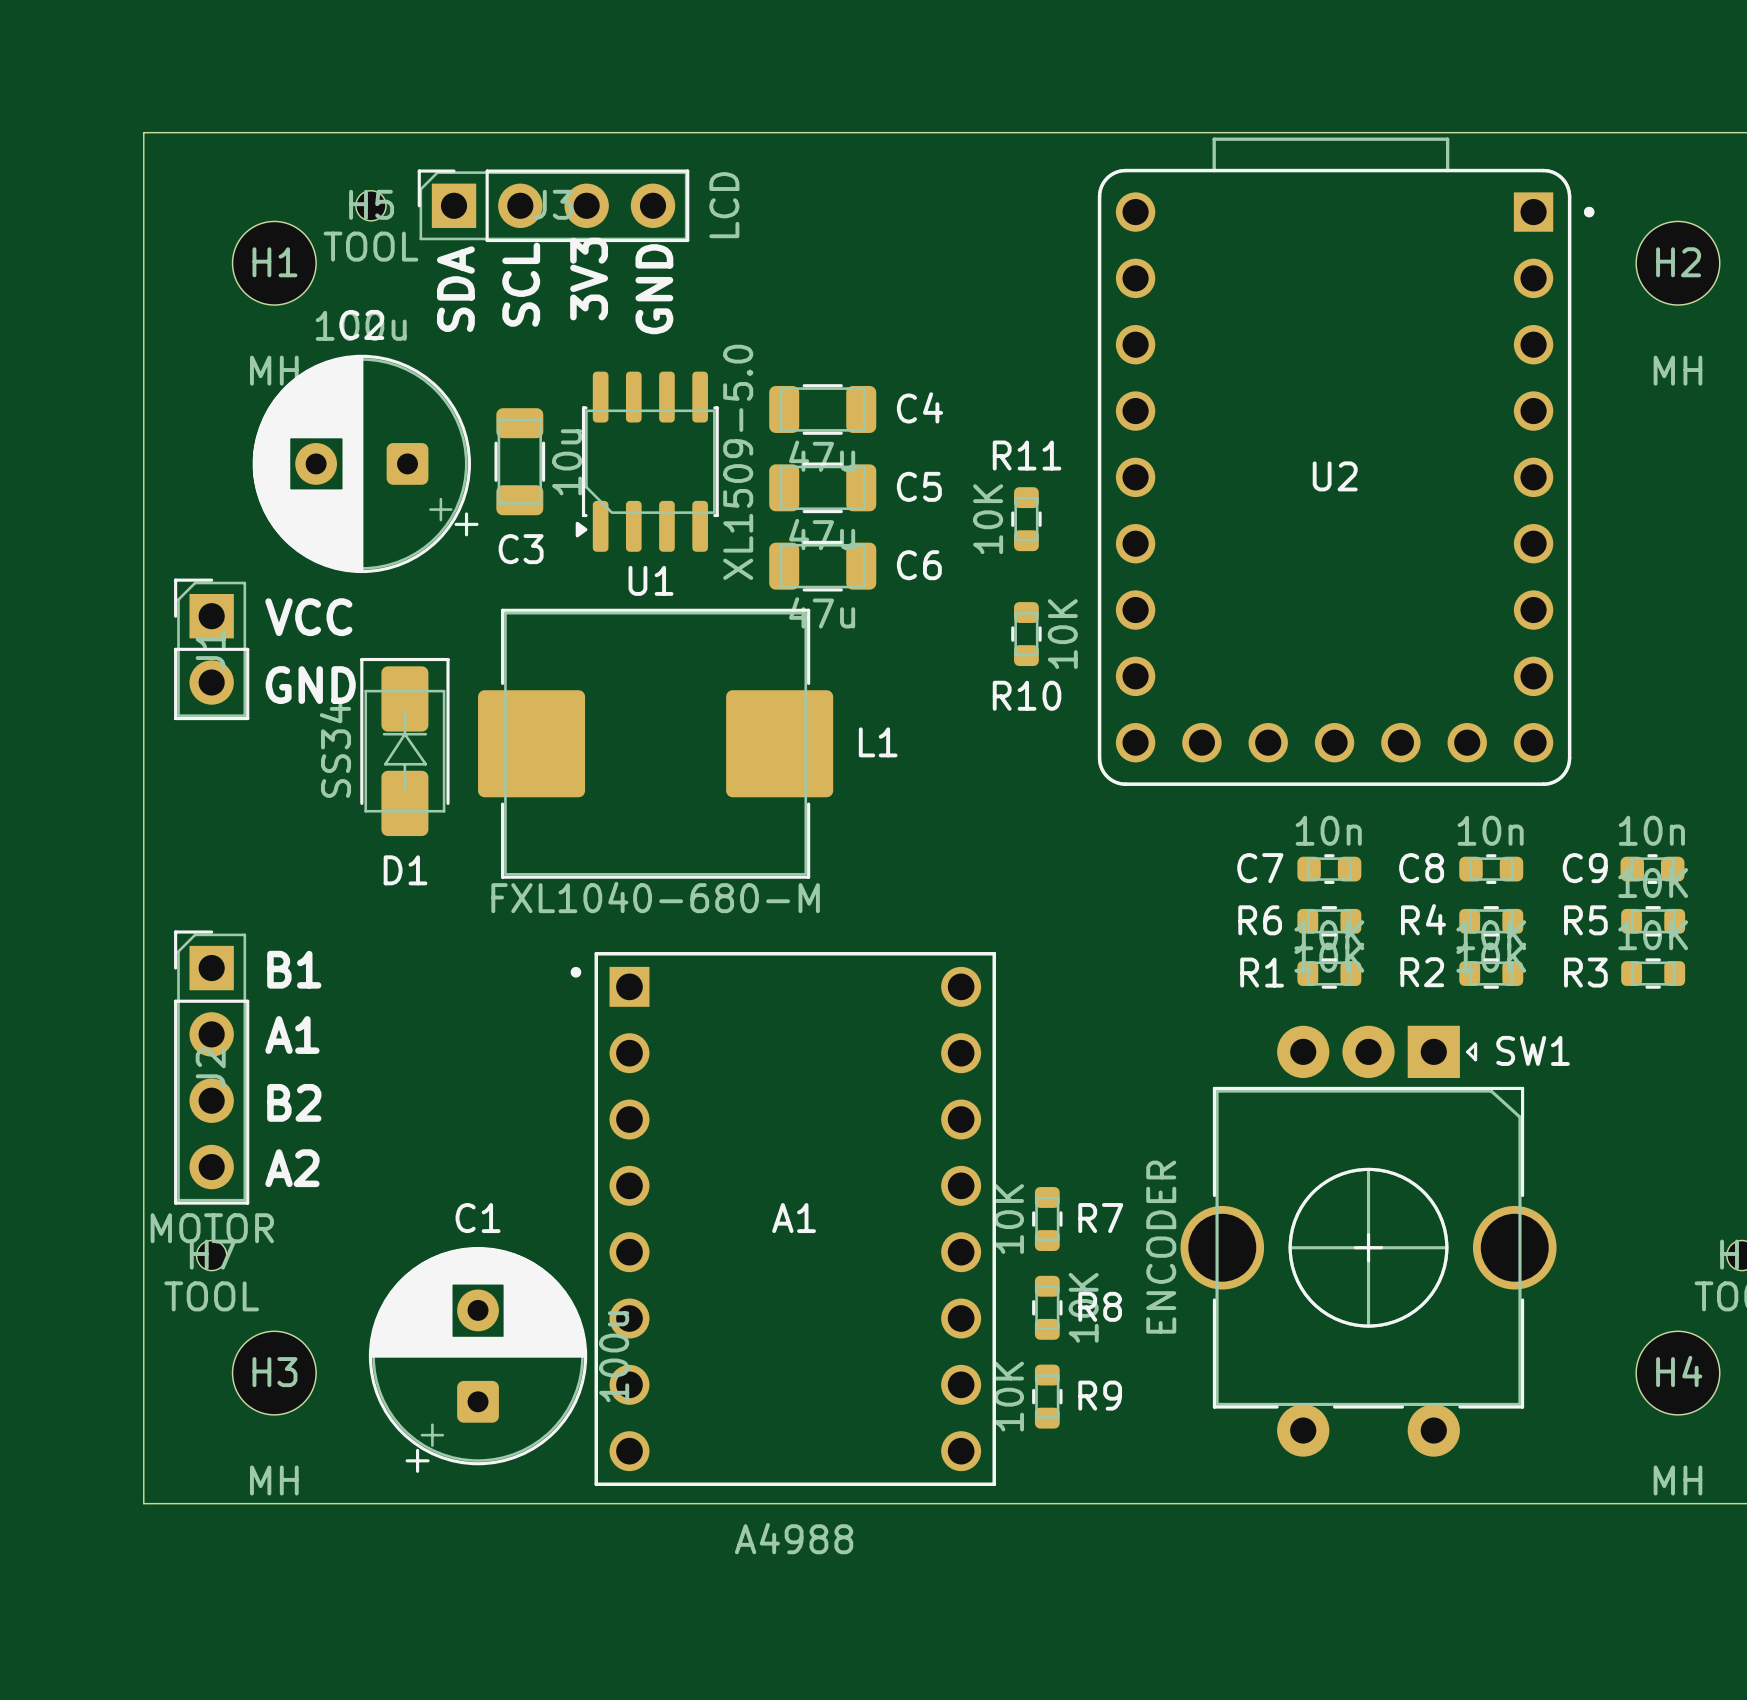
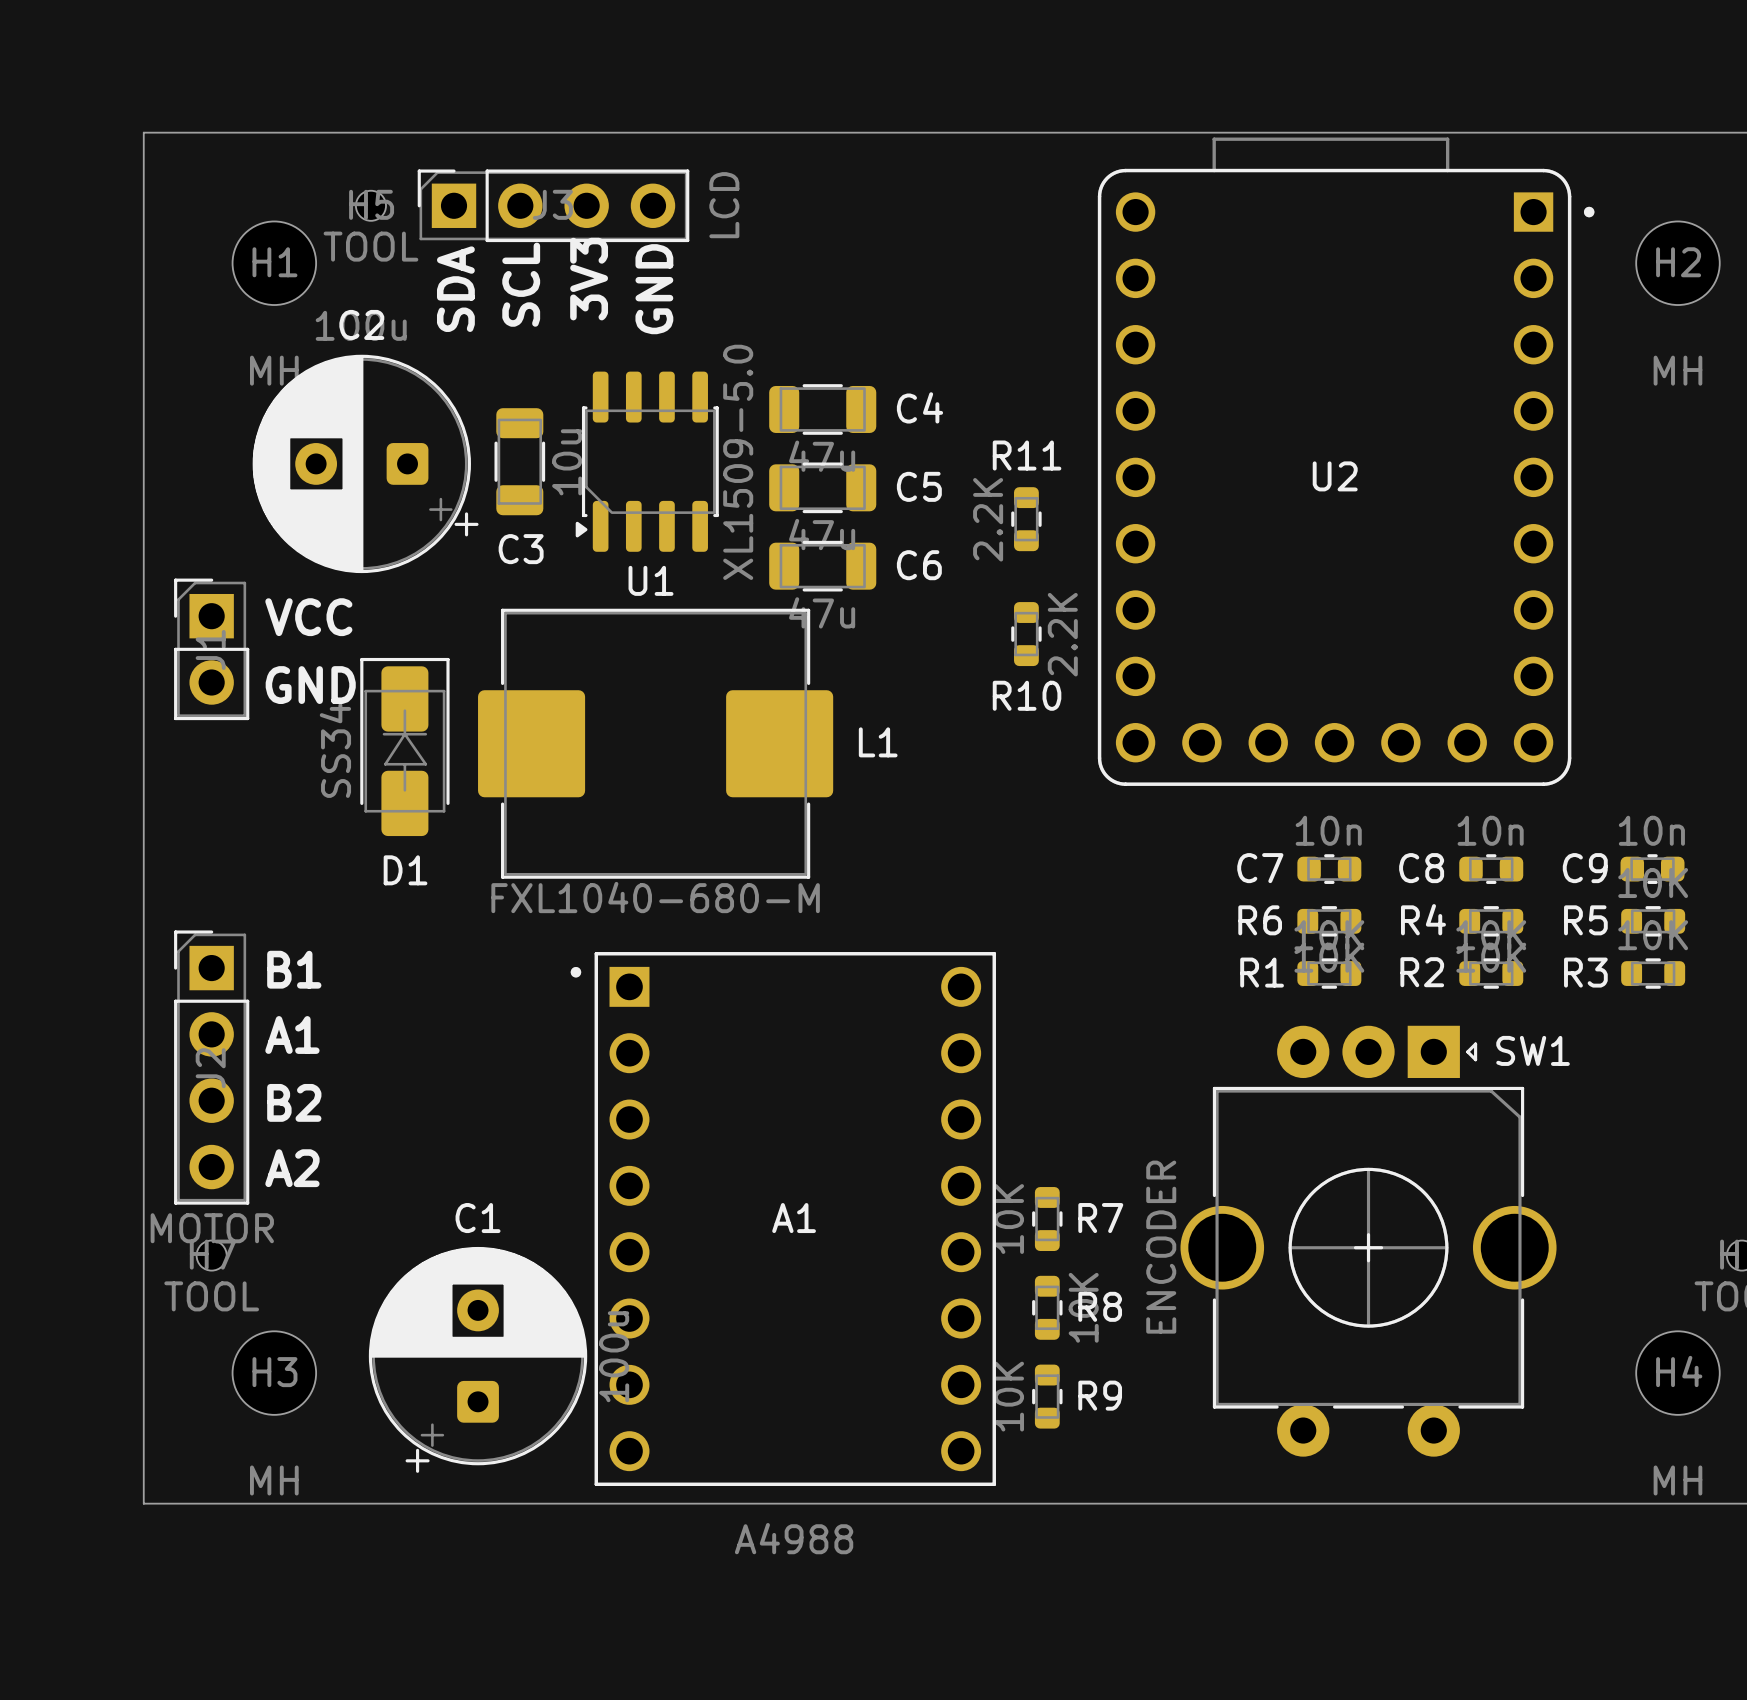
R11 value: 10K (988, 519) -> 2.2K (988, 519)
R10 value: 10K (1062, 634) -> 2.2K (1062, 634)

